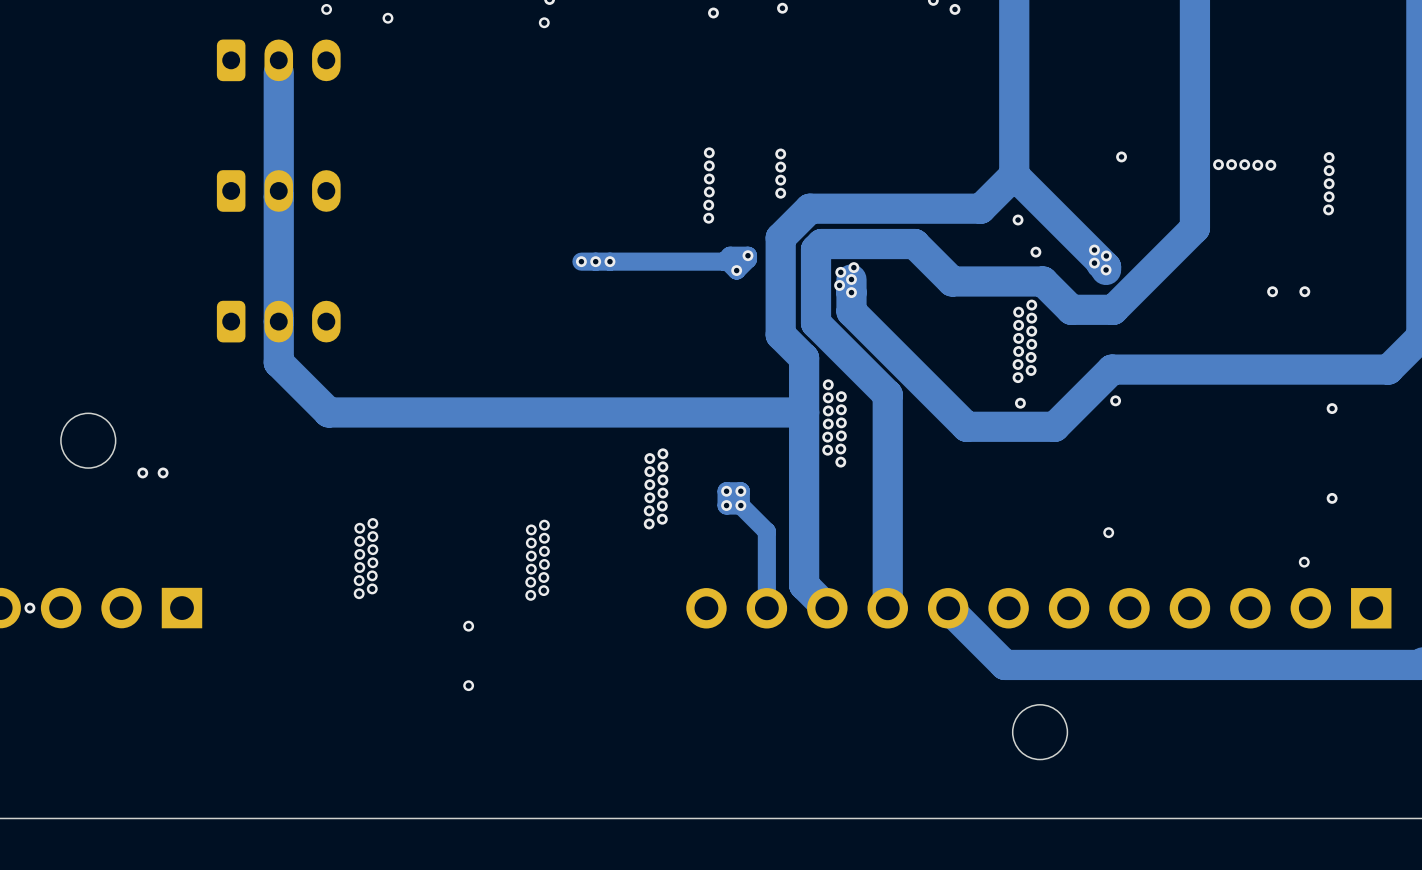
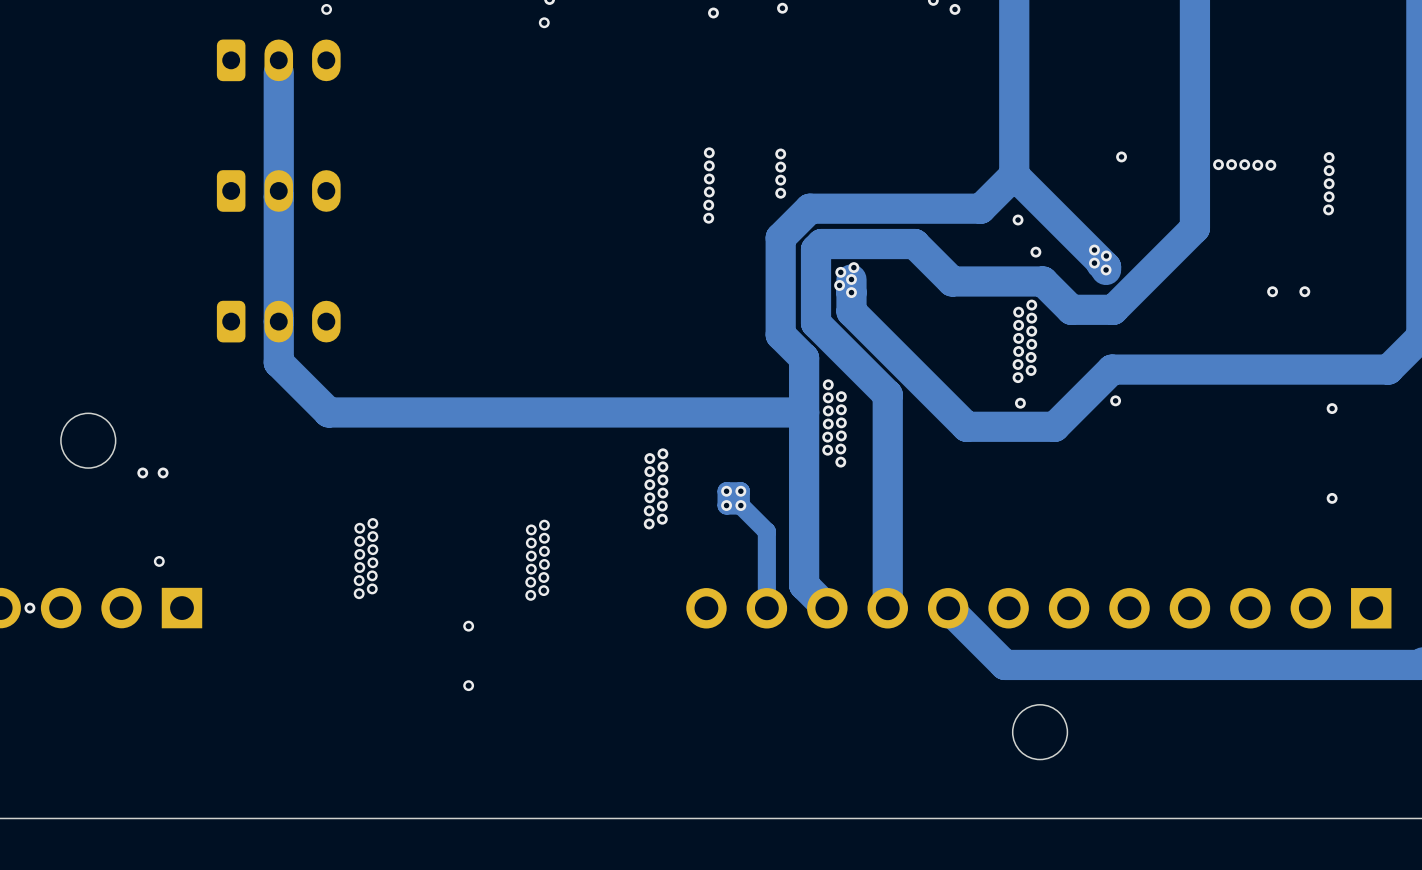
via: (387, 18) -> none
via: (747, 255) -> none
via: (581, 261) -> none
via: (595, 261) -> none
via: (609, 261) -> none
track: (724, 261) (730, 255) (747, 255) (747, 259) (736, 270) (727, 261) (581, 261) -> none
via: (736, 270) -> none
via: (1108, 532) -> none
via: none -> (159, 561)
via: (1304, 562) -> none

